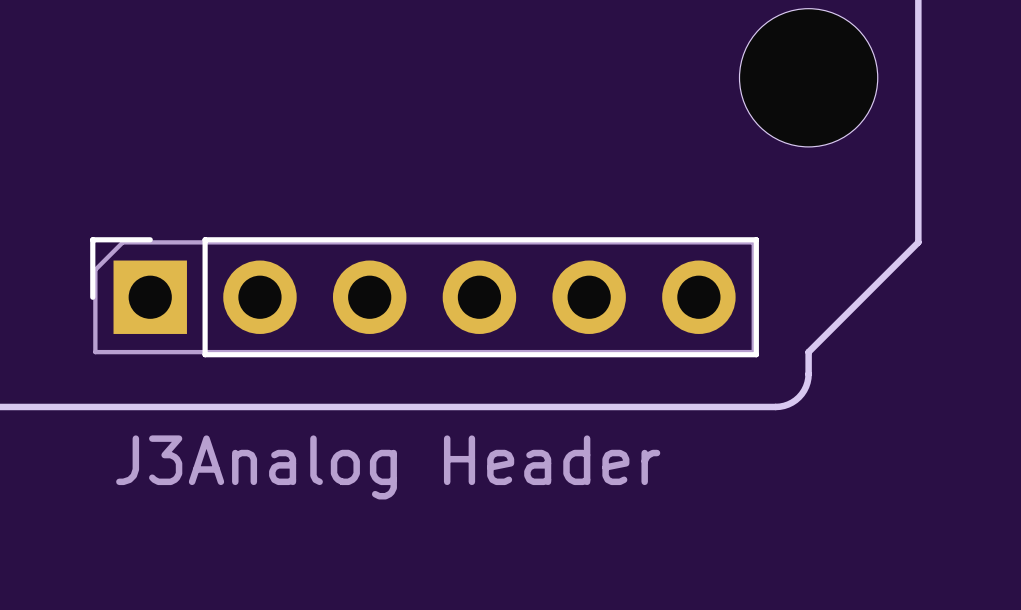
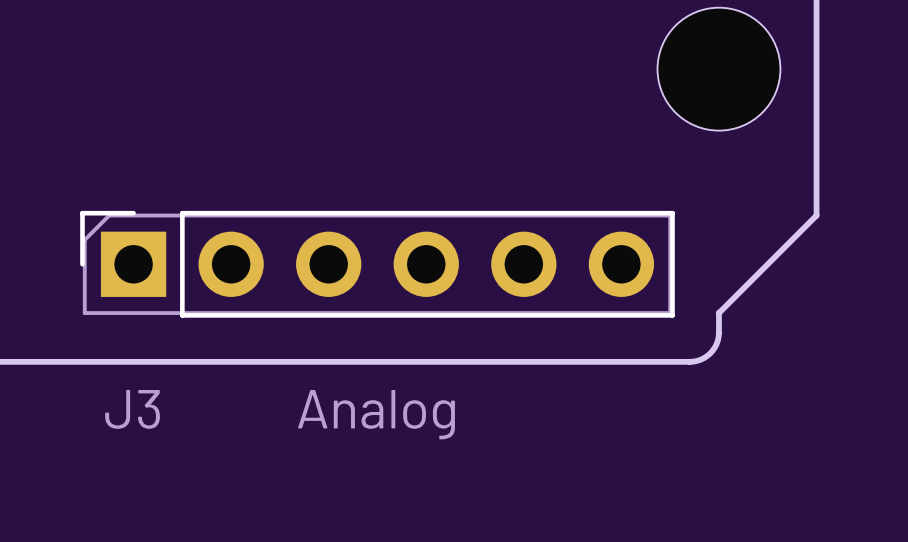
J3 value: Analog Header (424, 467) -> Analog (376, 414)

